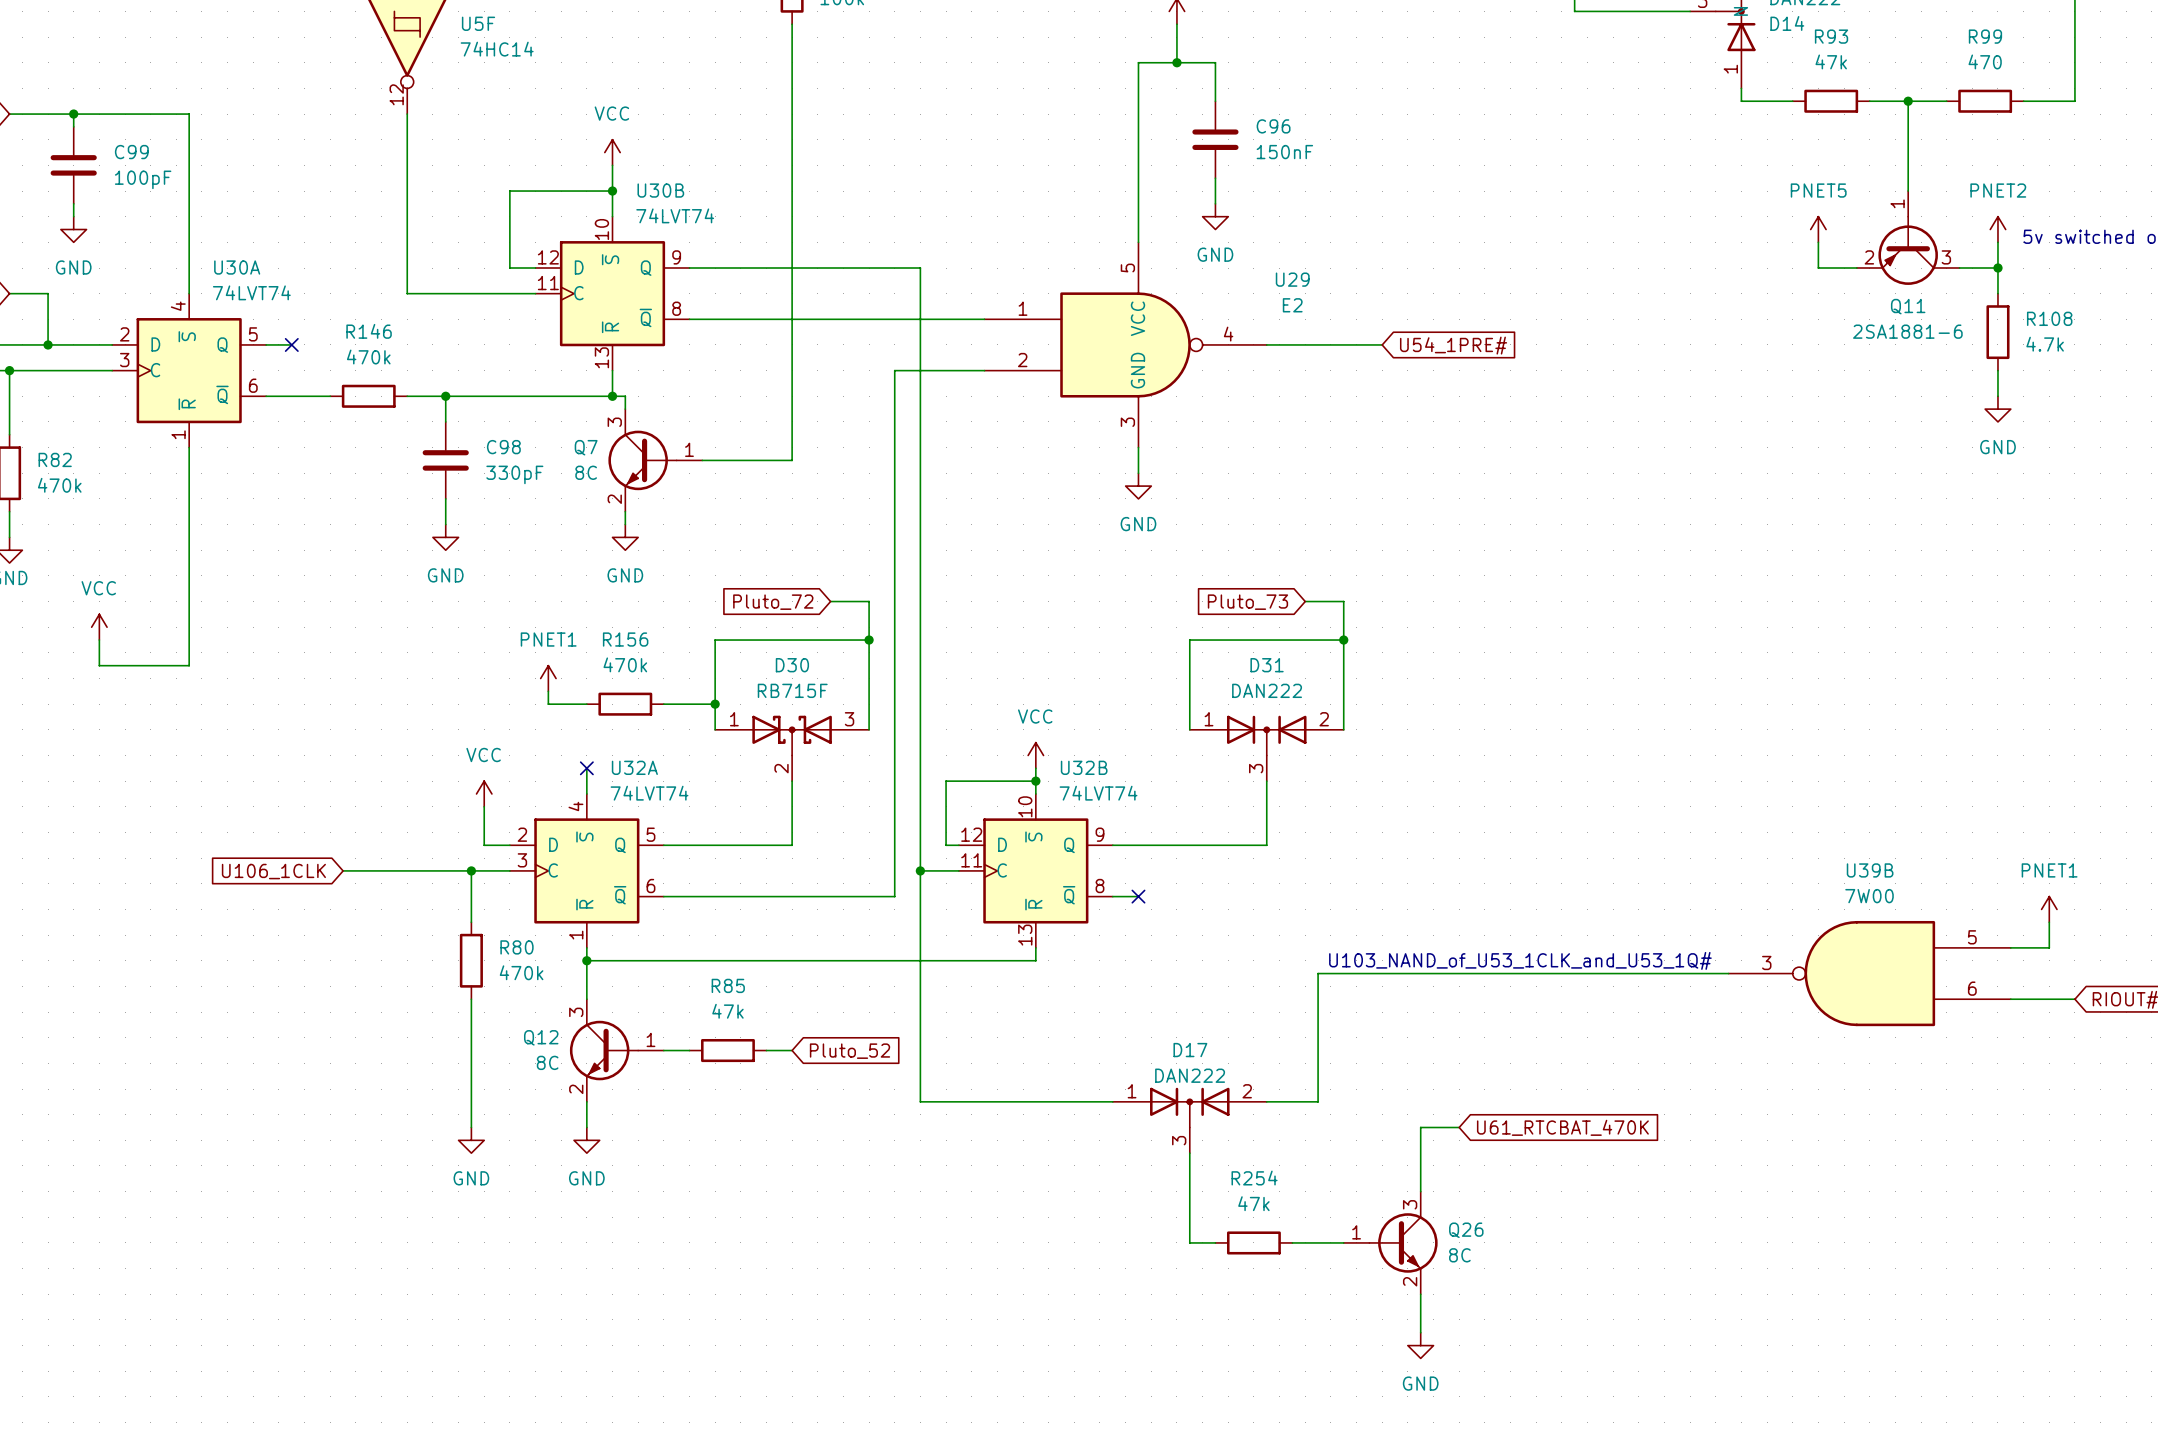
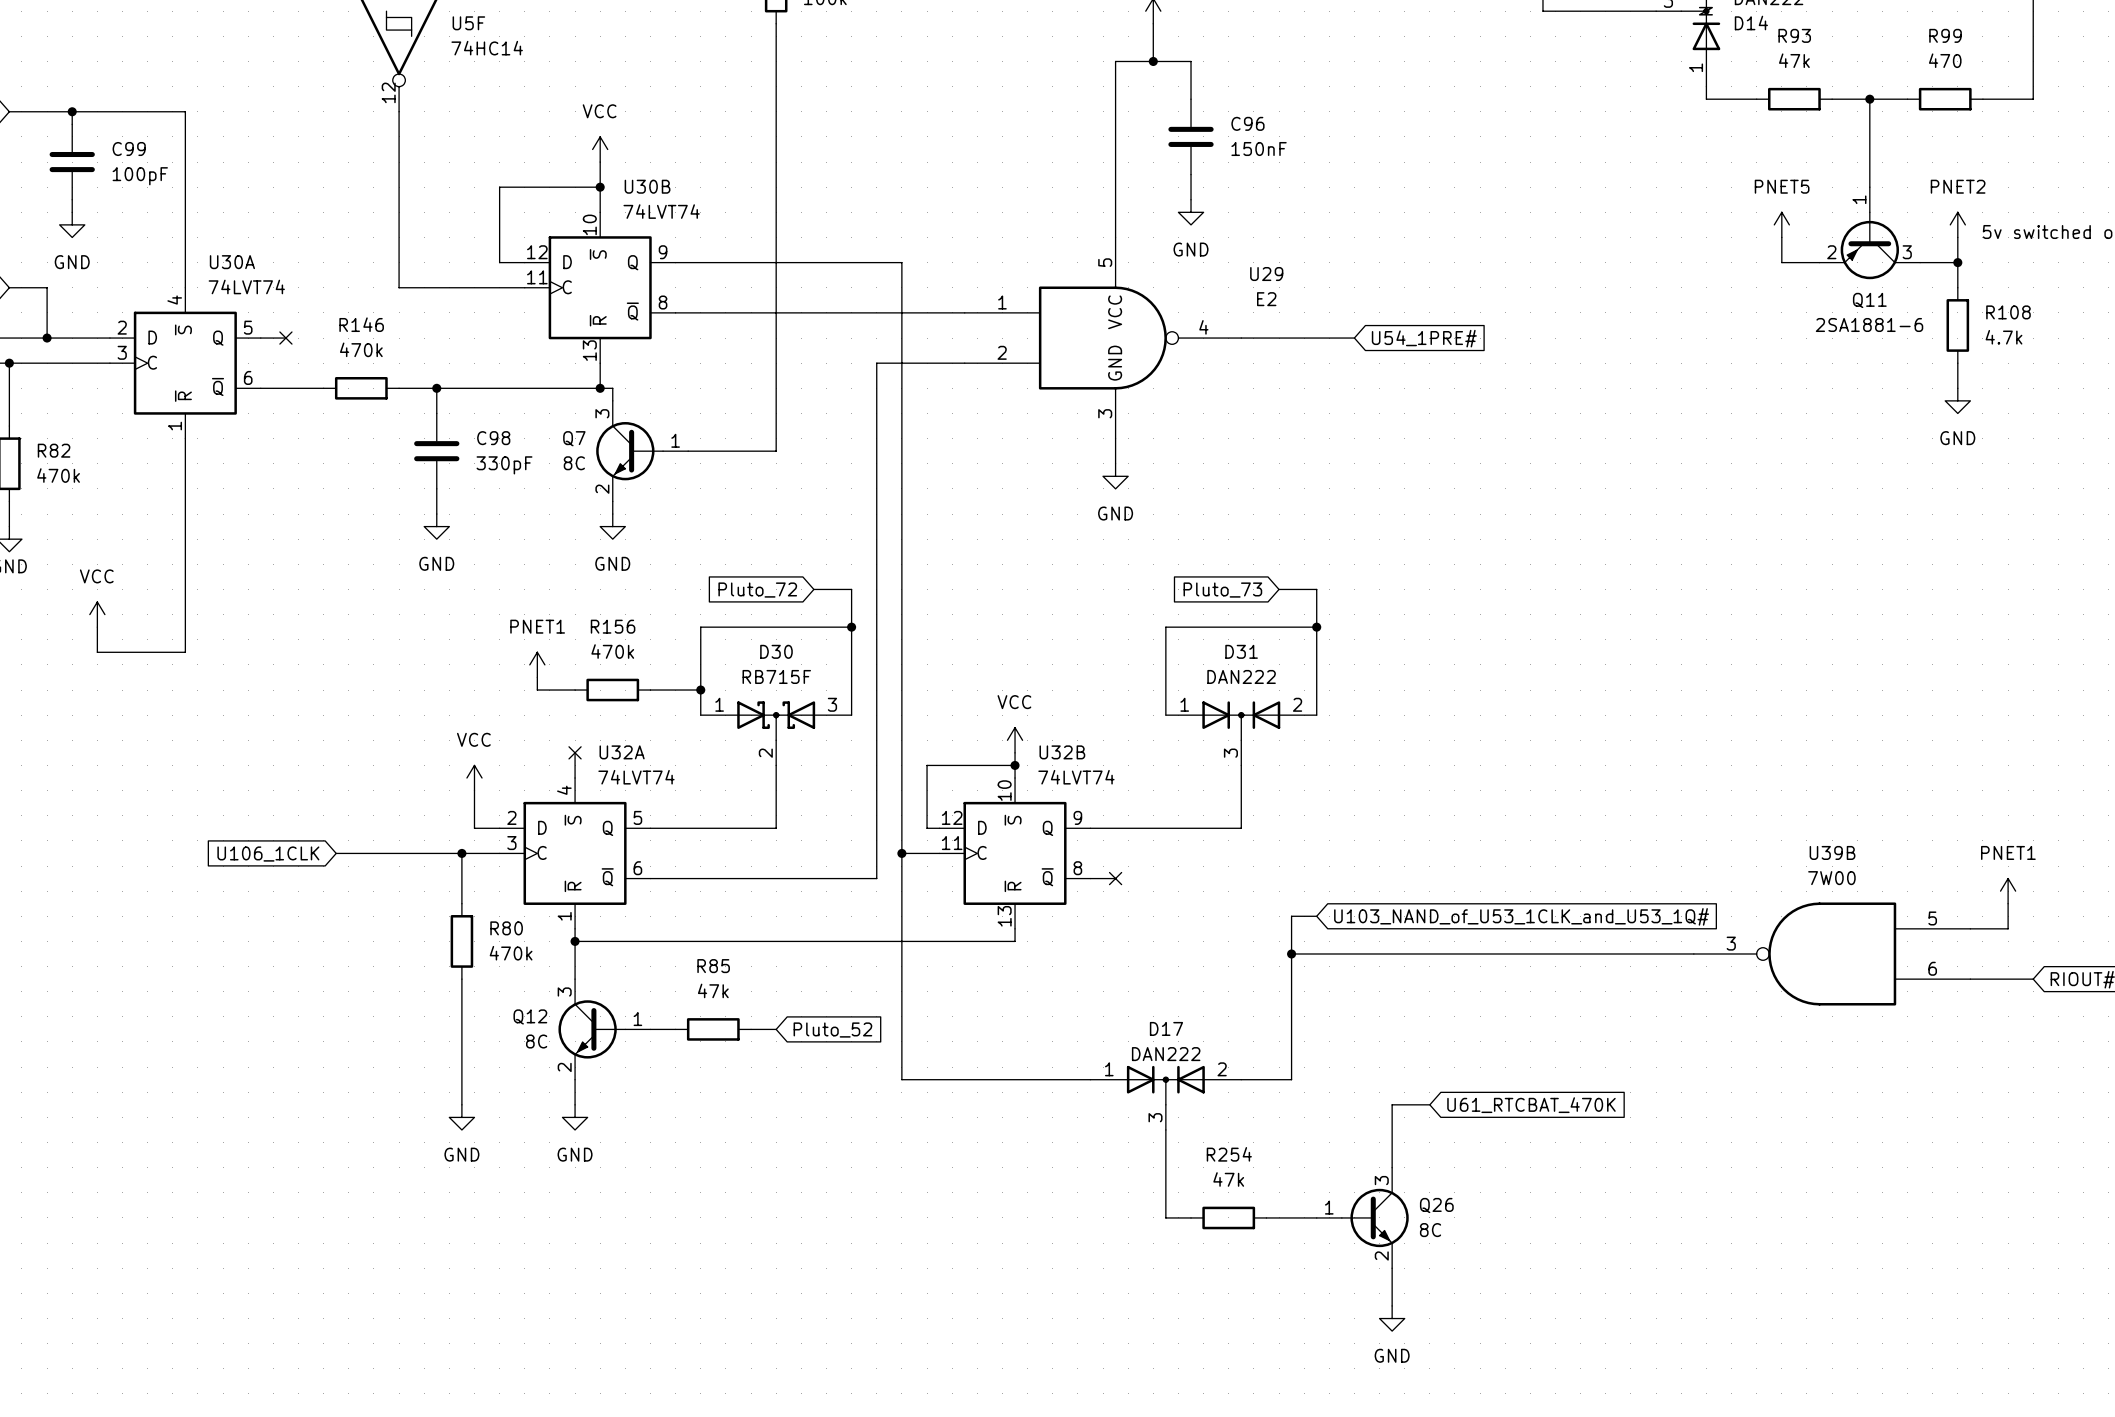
wire: none -> (1316, 916) (1291, 916) (1291, 953)
global label: none -> U103_NAND_of_U53_1CLK_and_U53_1Q# (1521, 916)
text: U103_NAND_of_U53_1CLK_and_U53_1Q# (1520, 960) -> none
junction: none -> (1291, 953)

